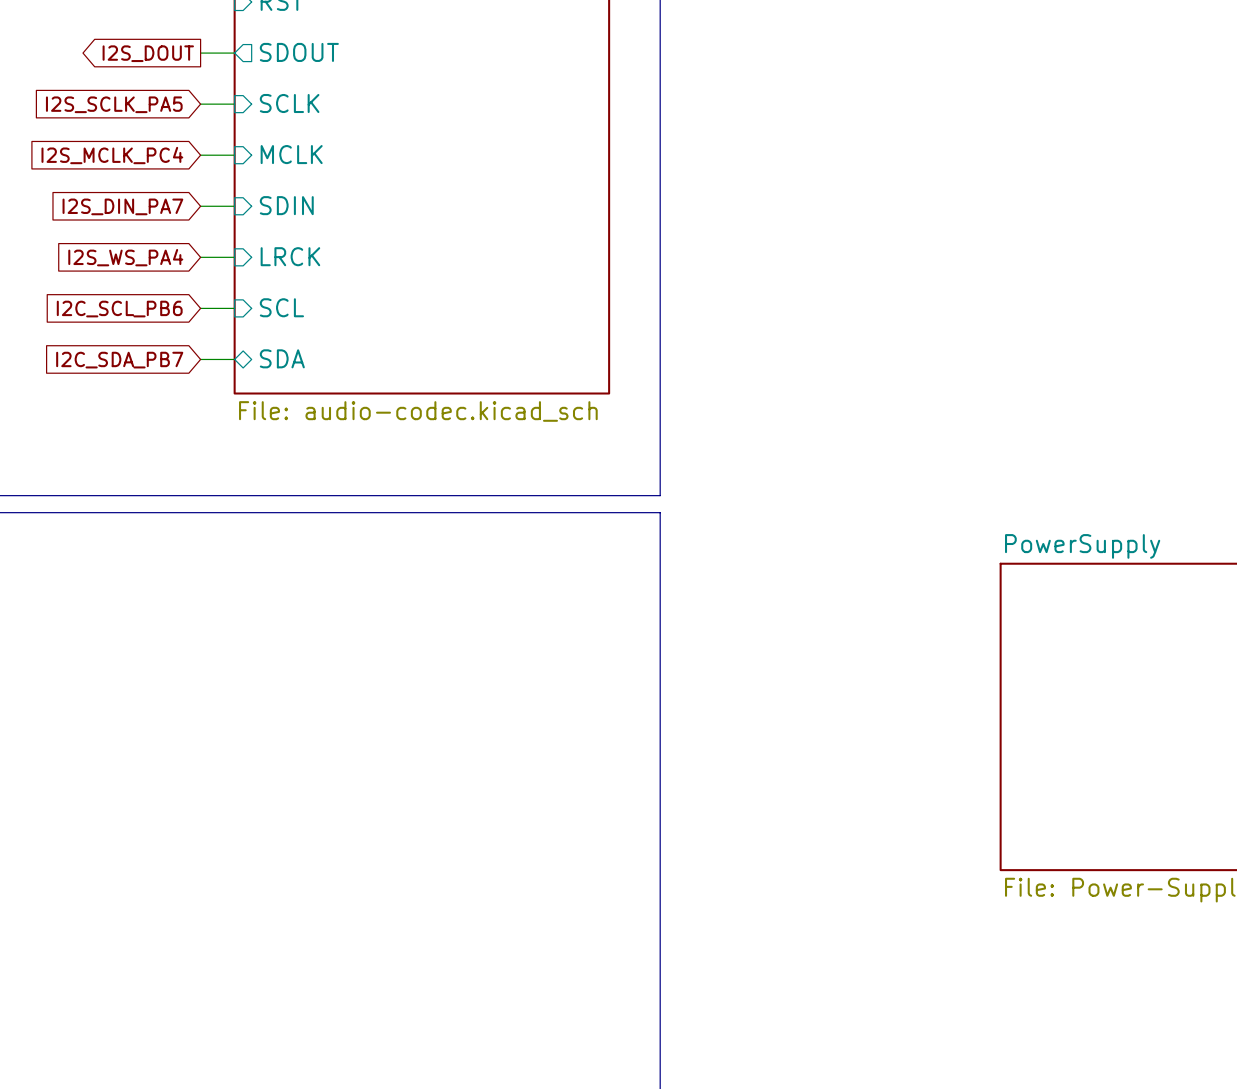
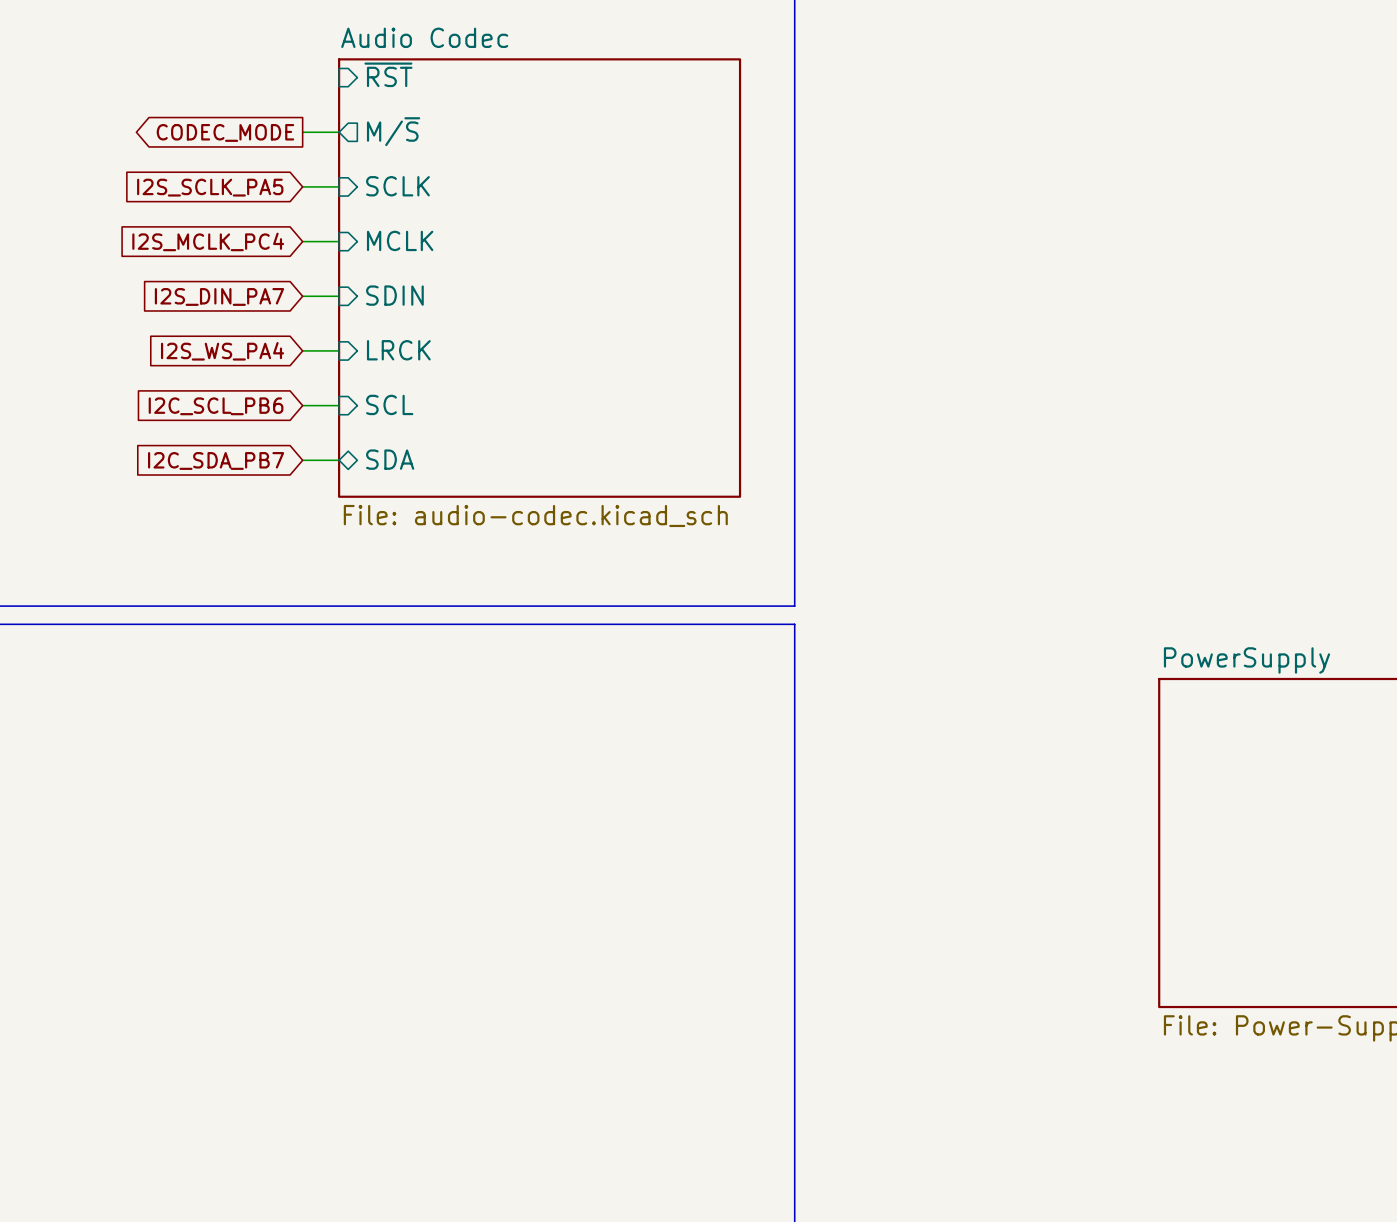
sheet pin: SDOUT (299, 52) -> M/~{S} (393, 131)
global label: I2S_DOUT (148, 53) -> CODEC_MODE (225, 132)

